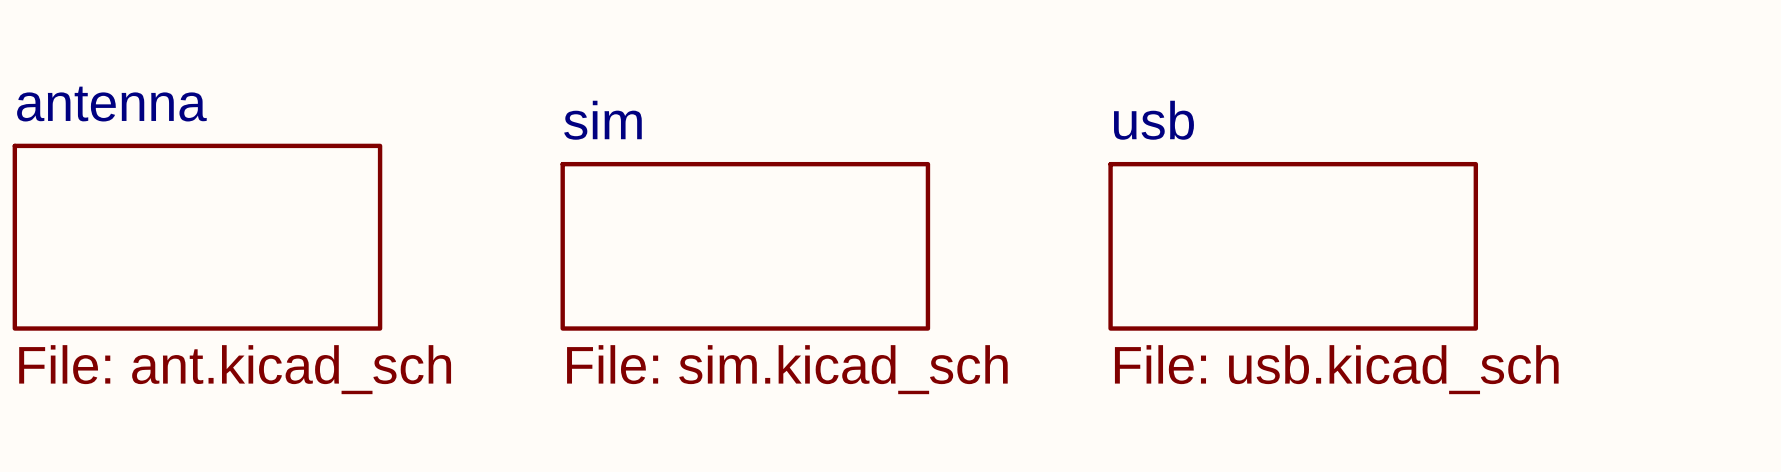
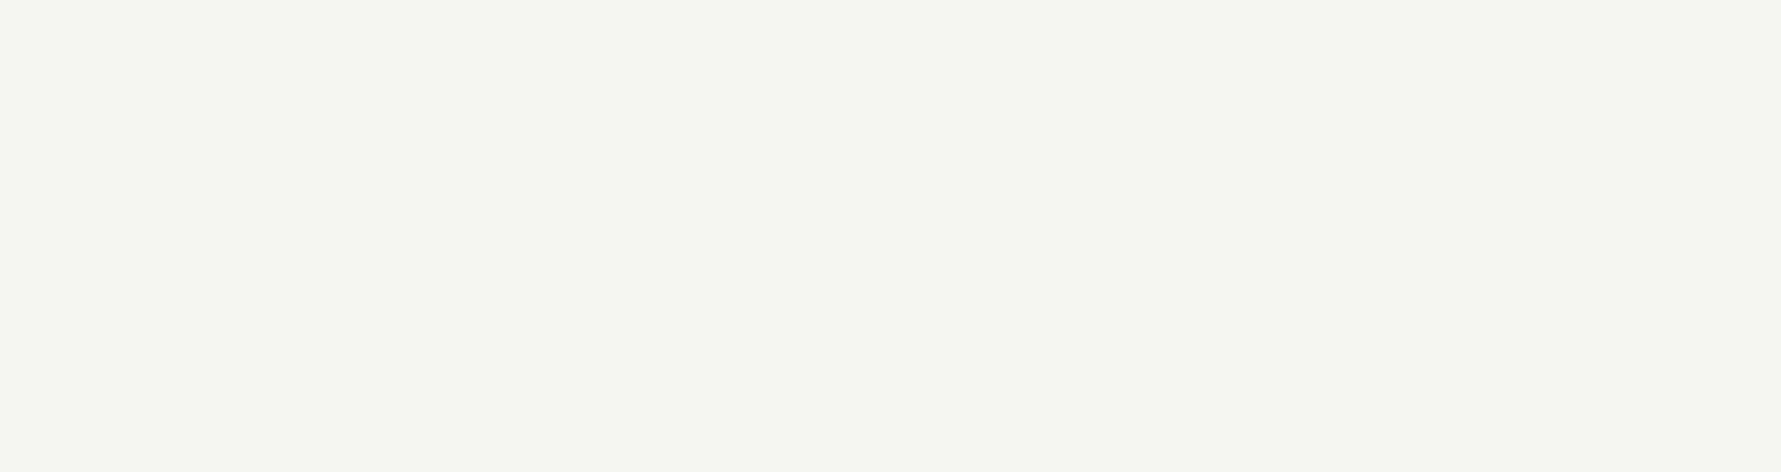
sheet antenna: File: ant.kicad_sch (197, 237) -> none
sheet sim: File: sim.kicad_sch (745, 246) -> none
sheet usb: File: usb.kicad_sch (1293, 246) -> none

